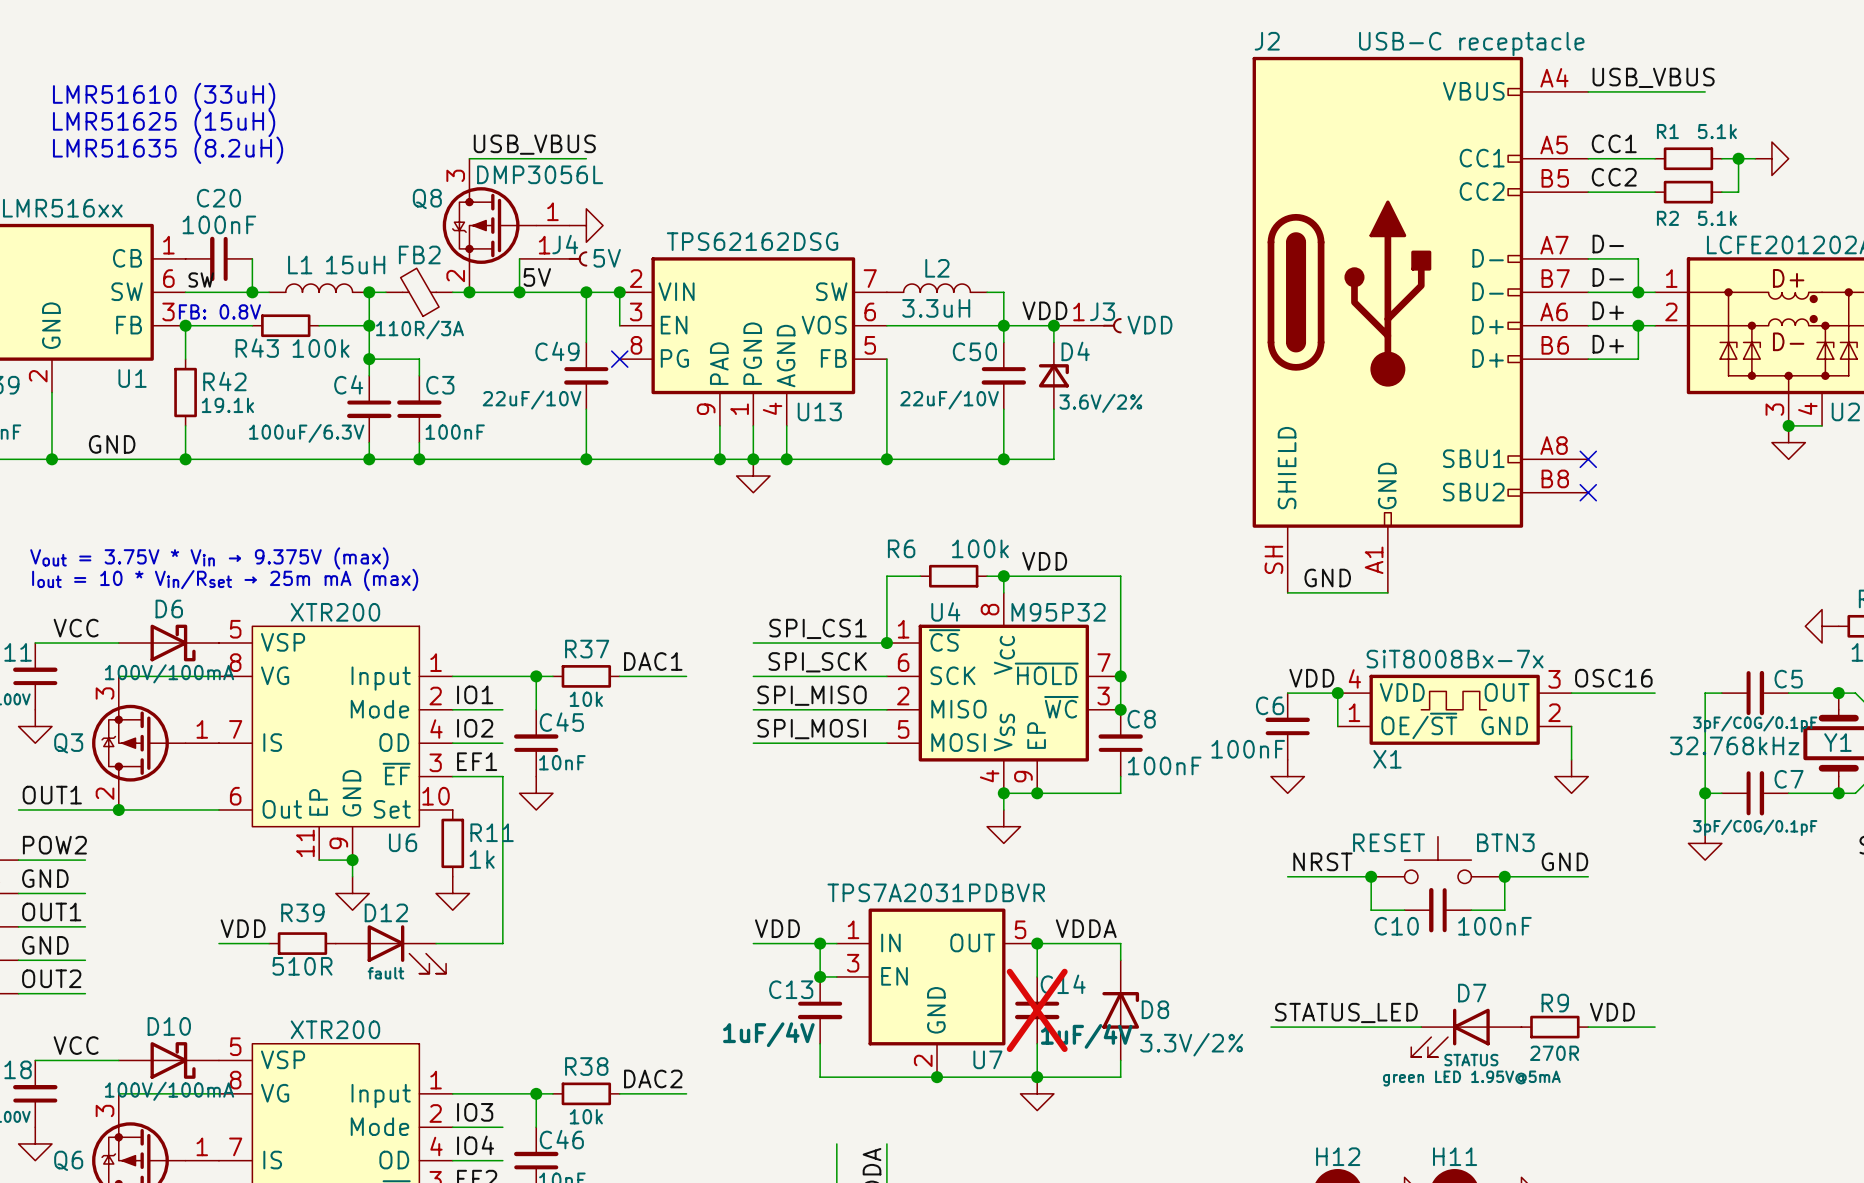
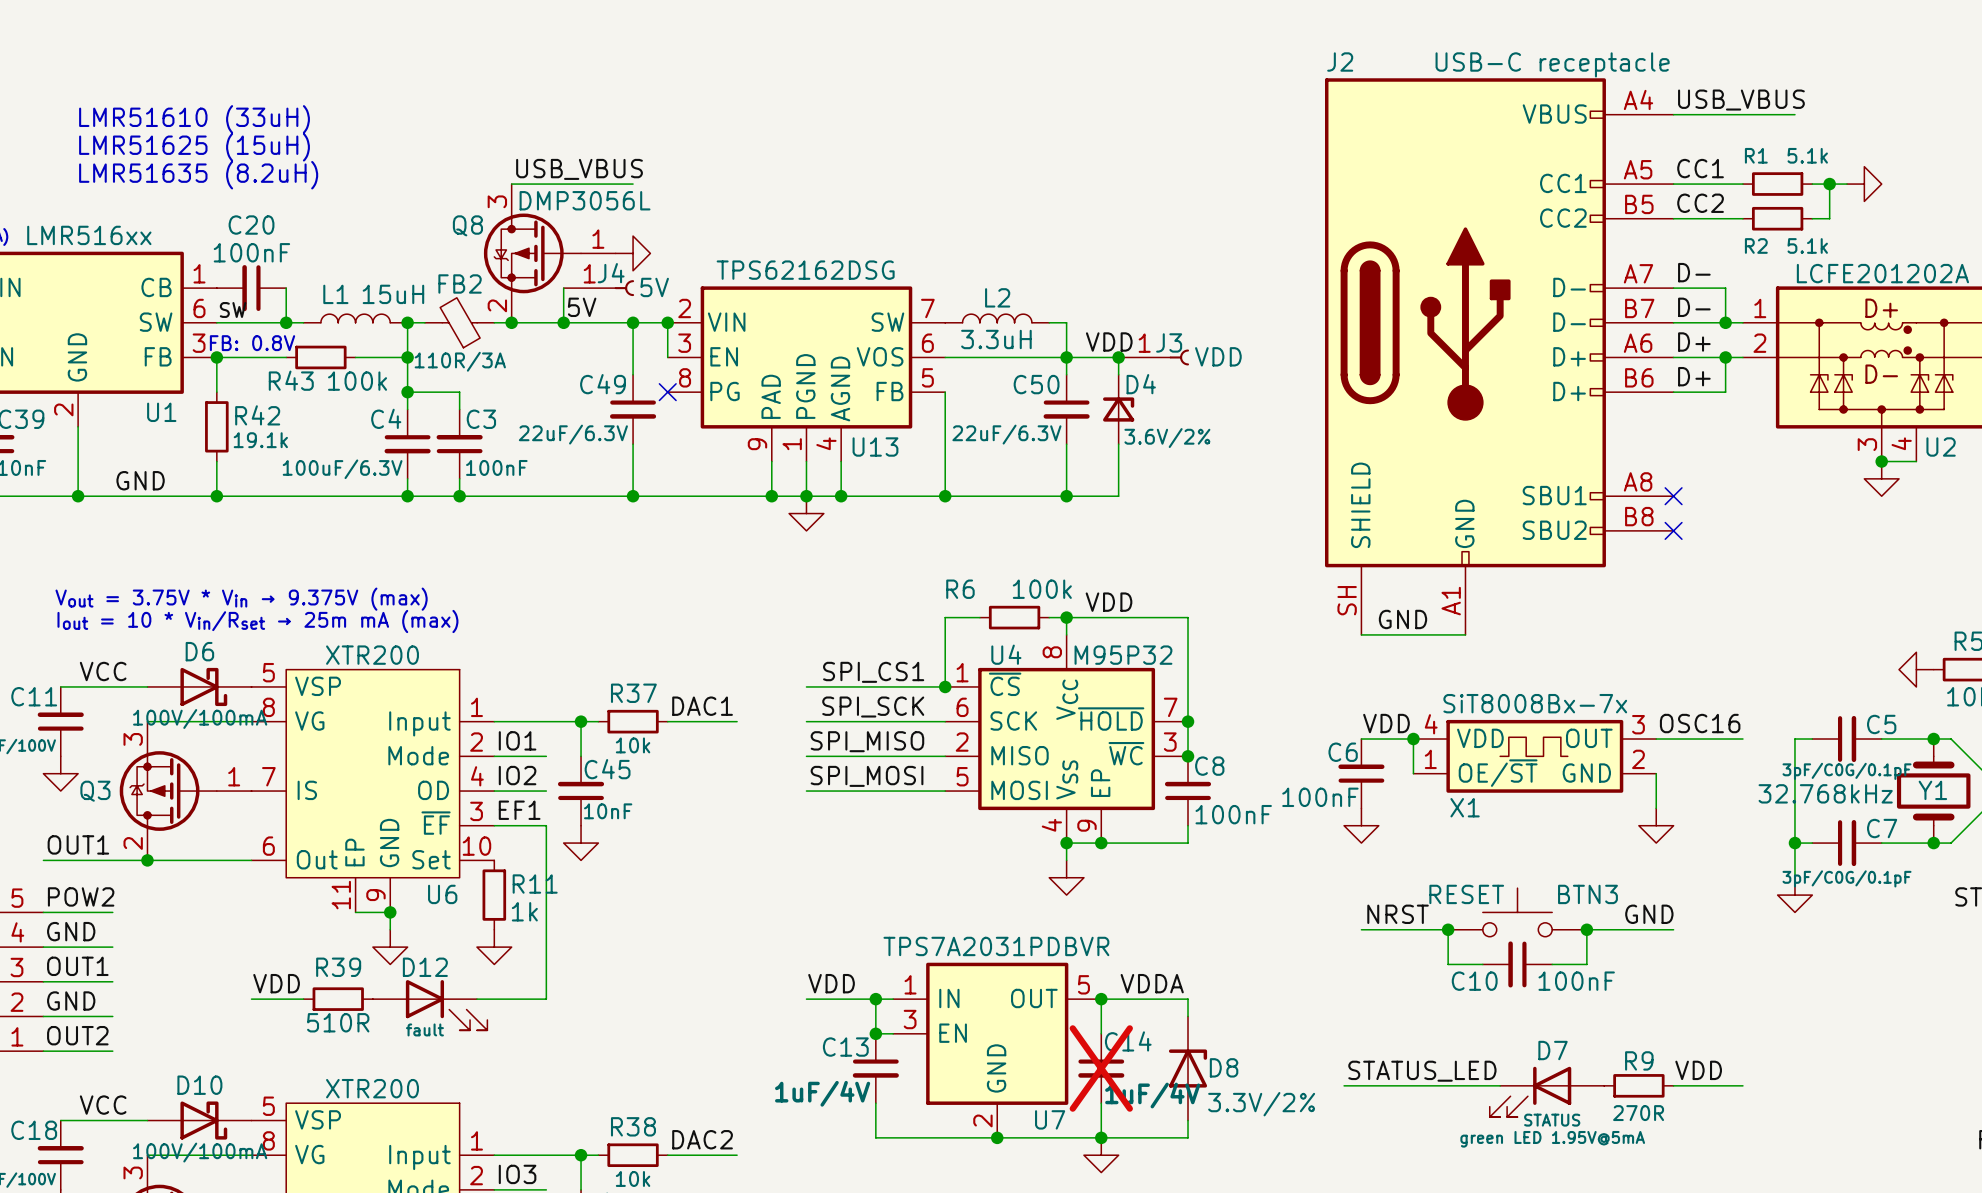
C49 value: 22uF/10V (532, 399) -> 22uF/6.3V (573, 434)
C50 value: 22uF/10V (949, 399) -> 22uF/6.3V (1006, 434)

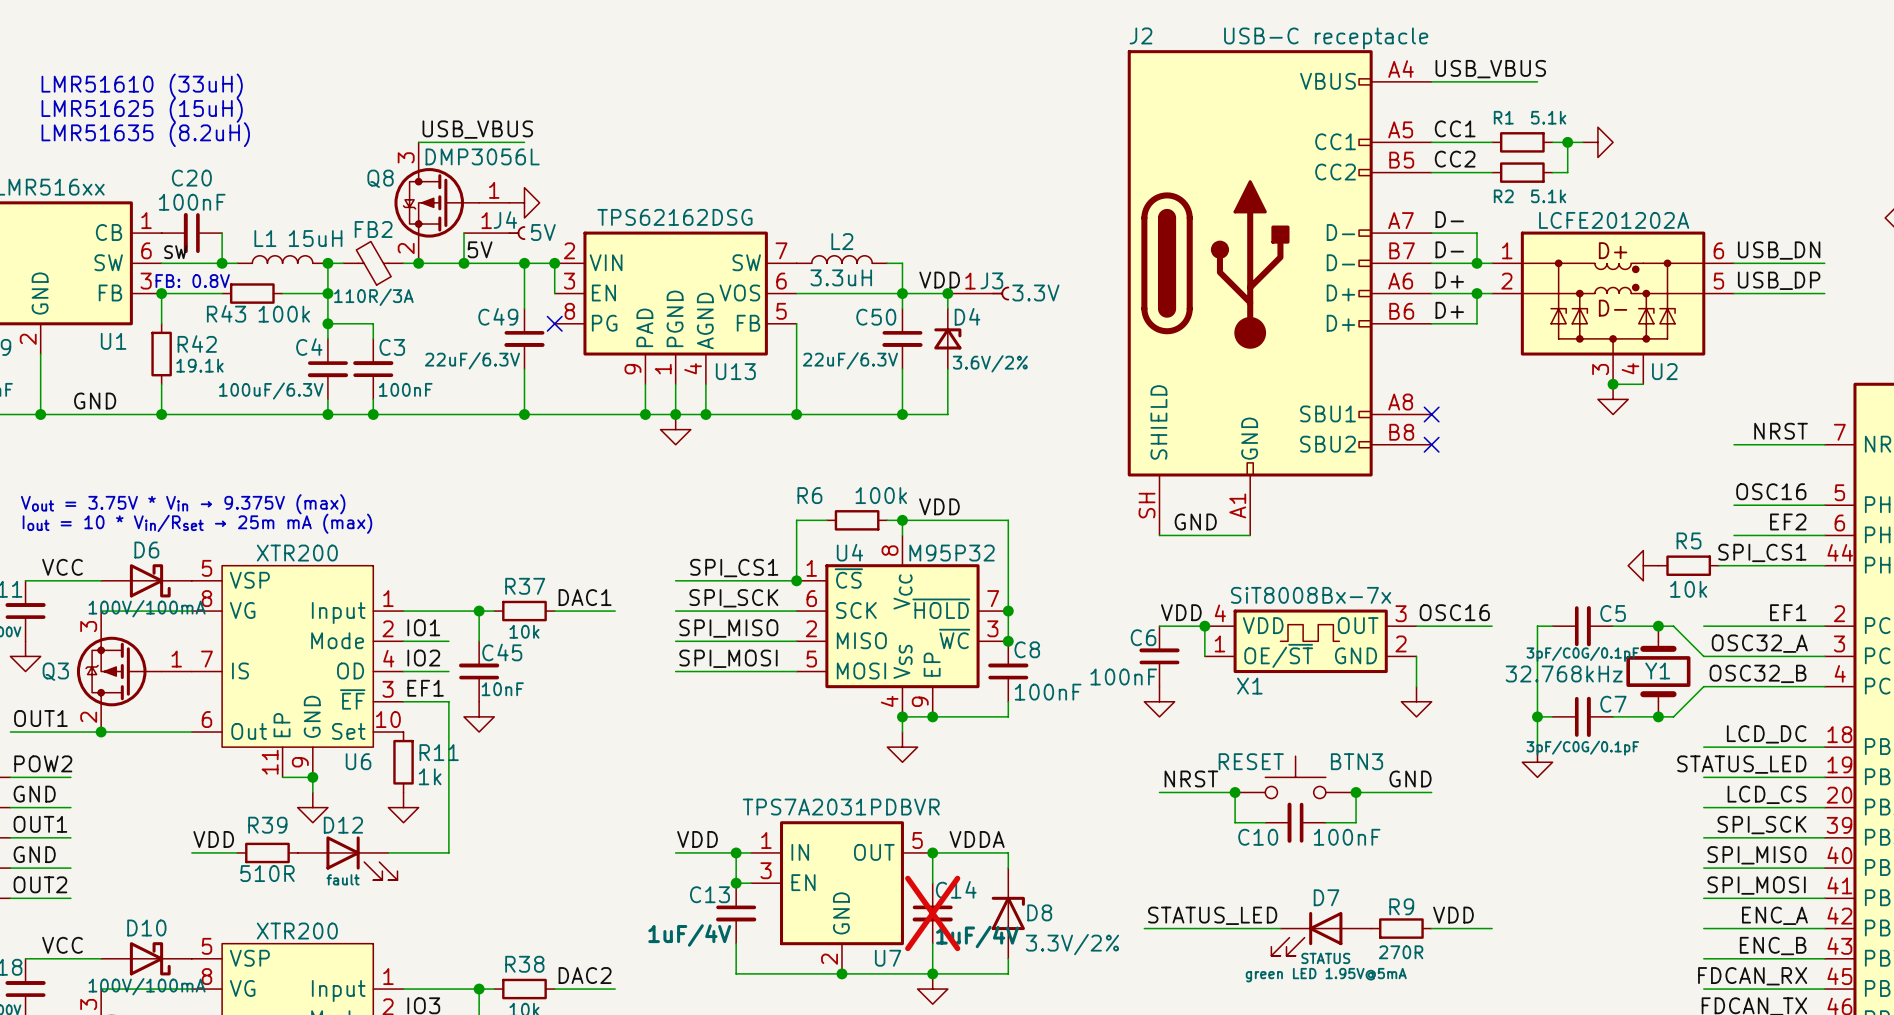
J3 text: VDD (1218, 356) -> 3.3V (1035, 292)

